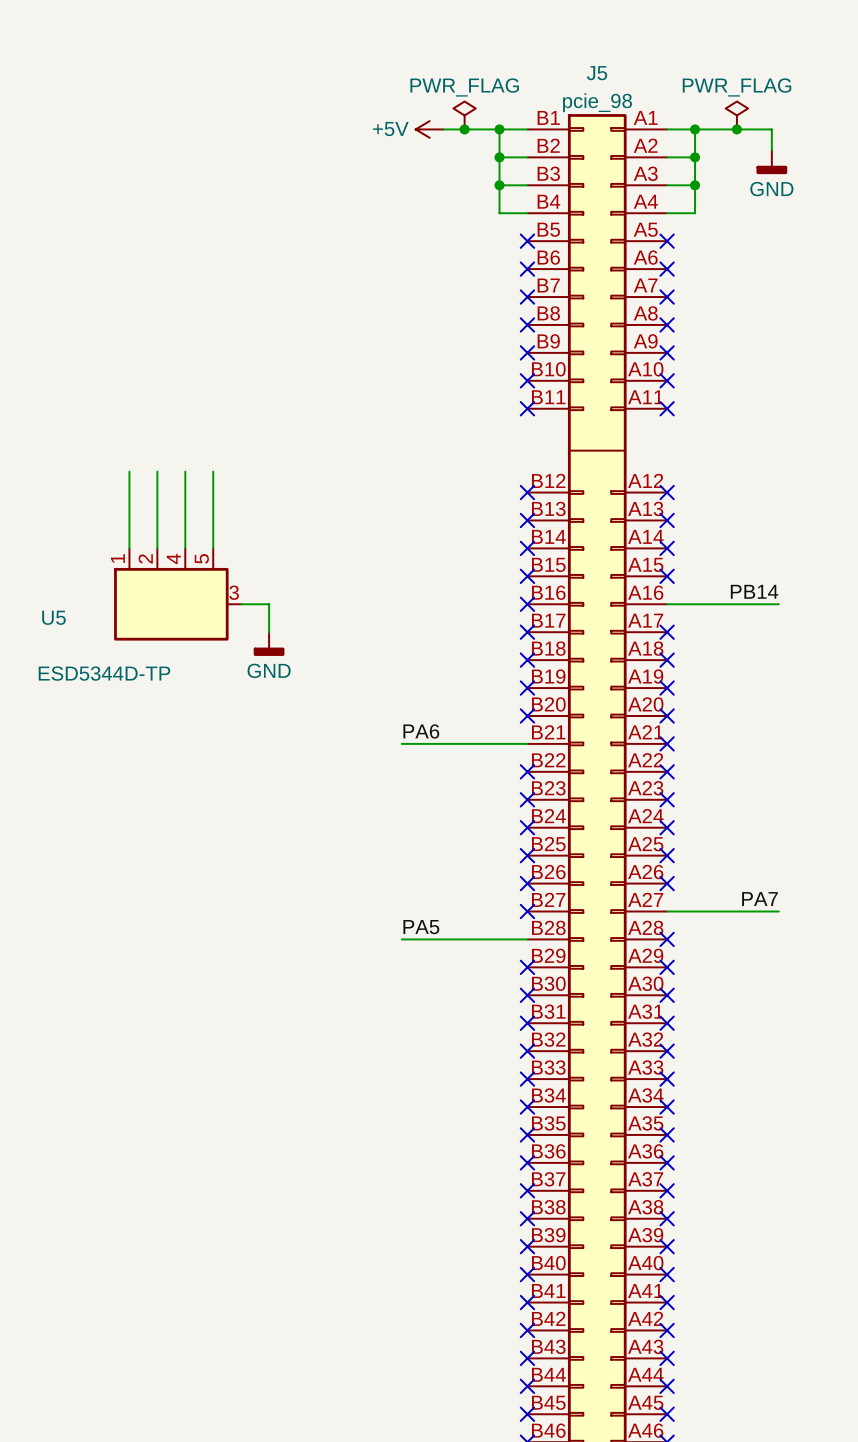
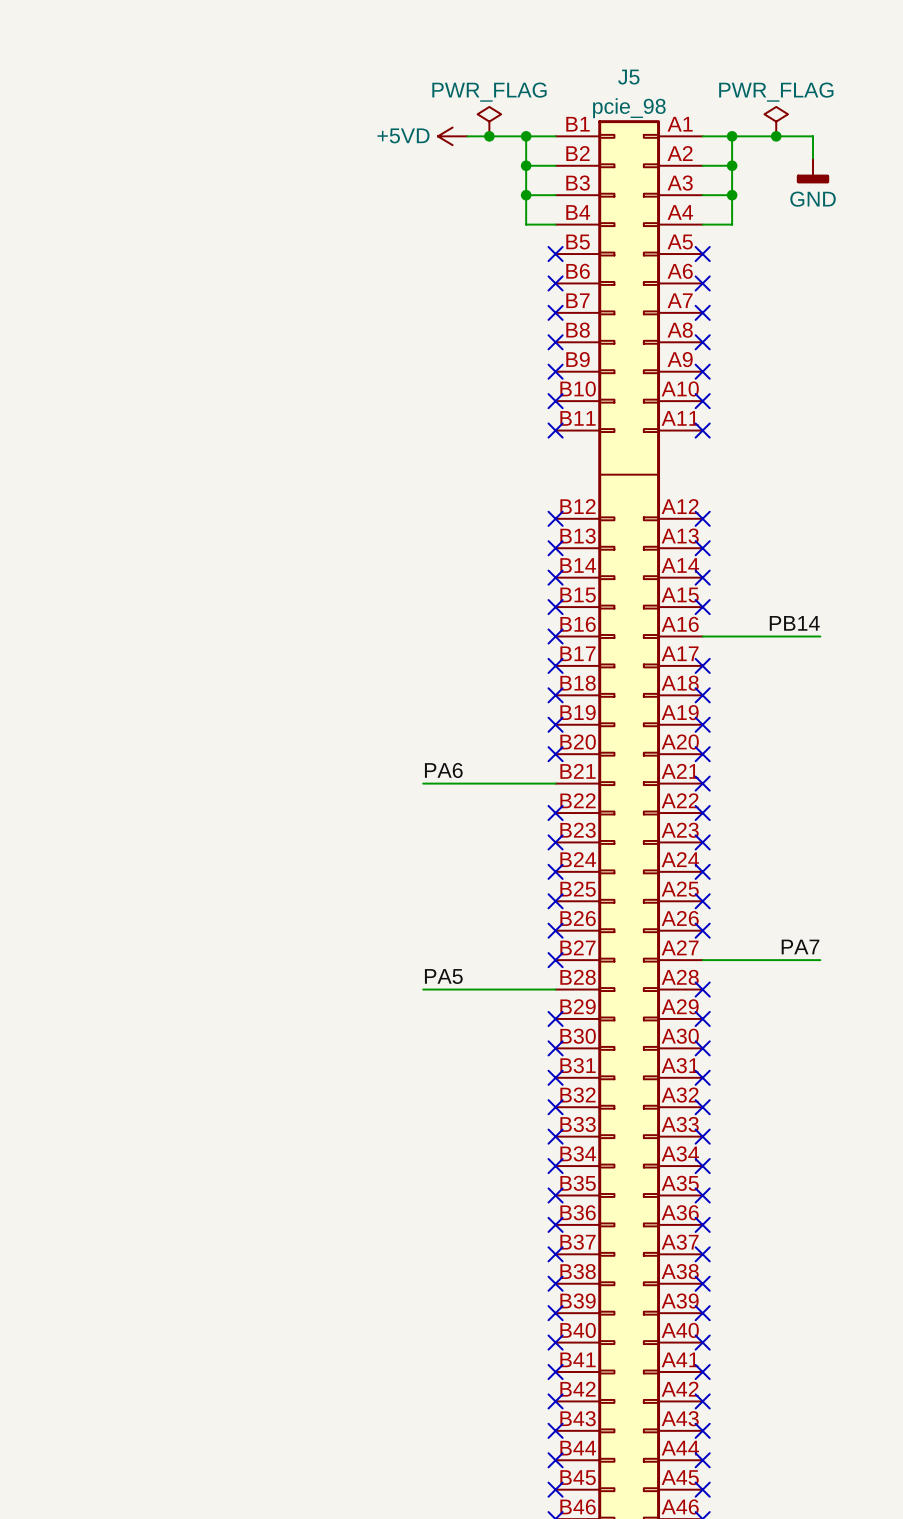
power symbol: +5V (429, 129) -> +5VD (452, 136)
wire: (129, 471) (129, 548) -> none
wire: (157, 471) (157, 548) -> none
wire: (185, 471) (185, 548) -> none
wire: (213, 471) (213, 548) -> none
U5: ESD5344D-TP (177, 594) -> none
wire: (241, 604) (269, 604) (269, 632) -> none
power symbol: GND (269, 644) -> none

